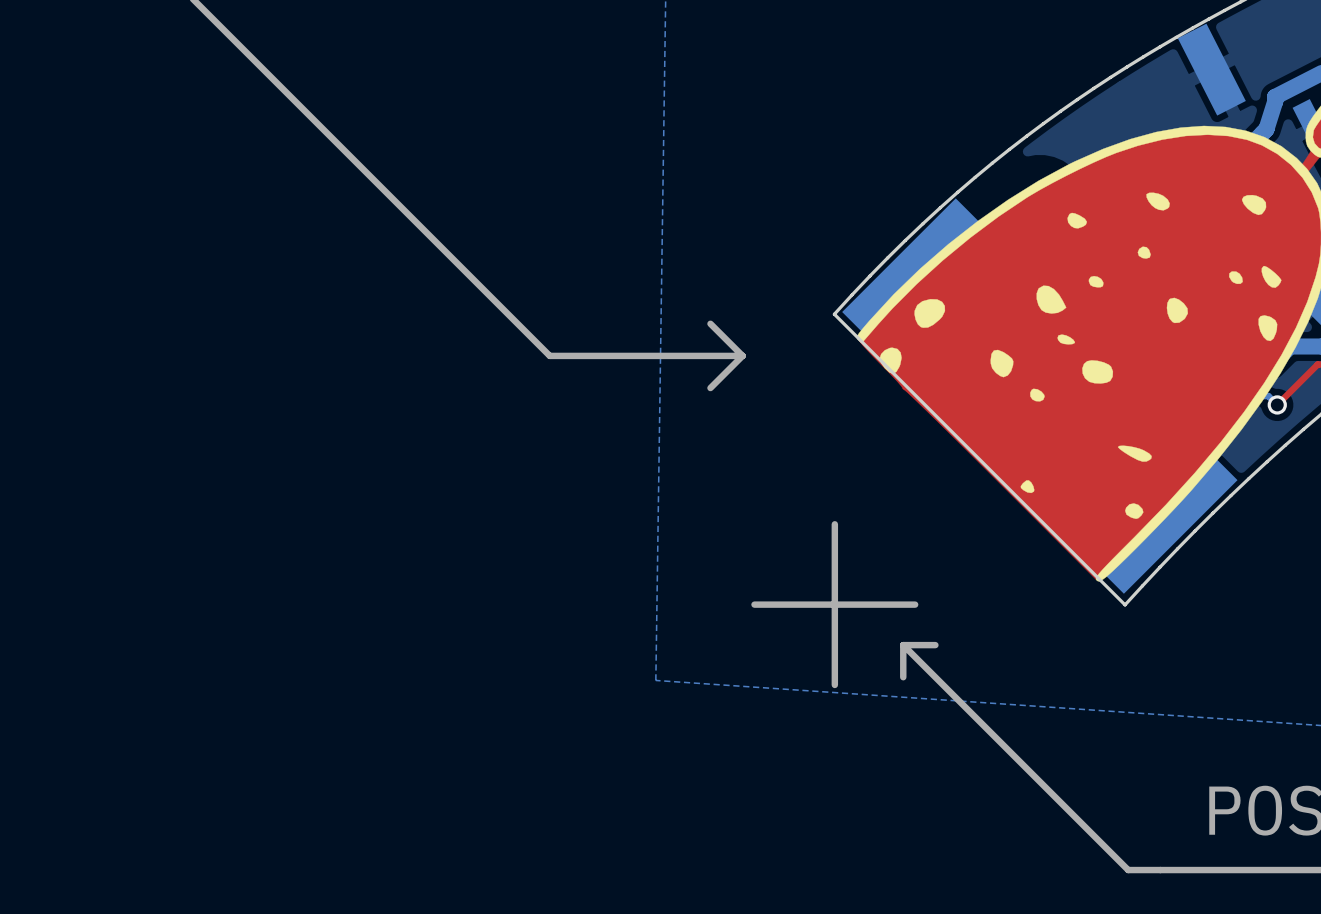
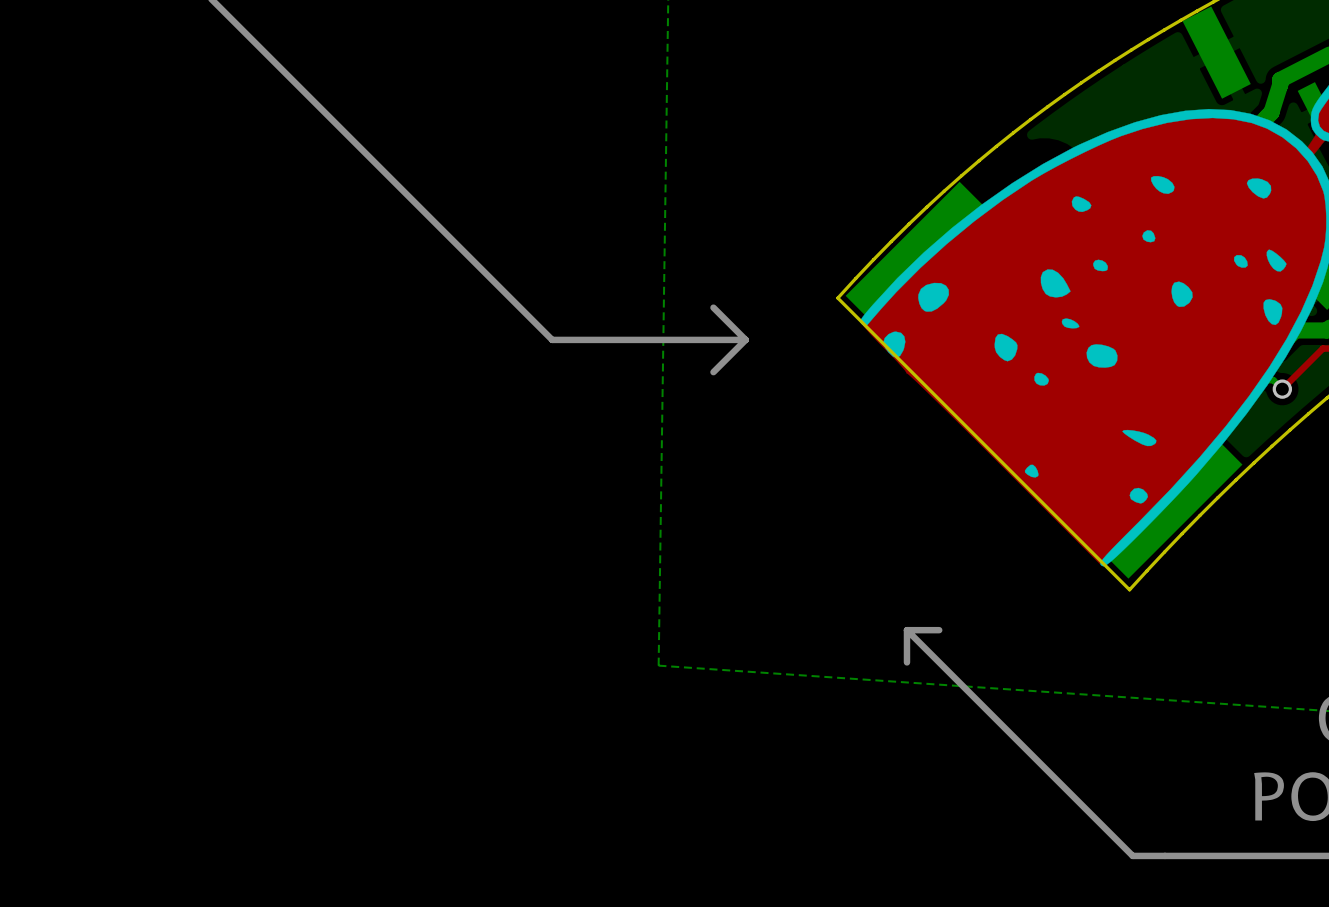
line: (834, 524) (834, 684) -> none
line: (754, 604) (915, 604) -> none

